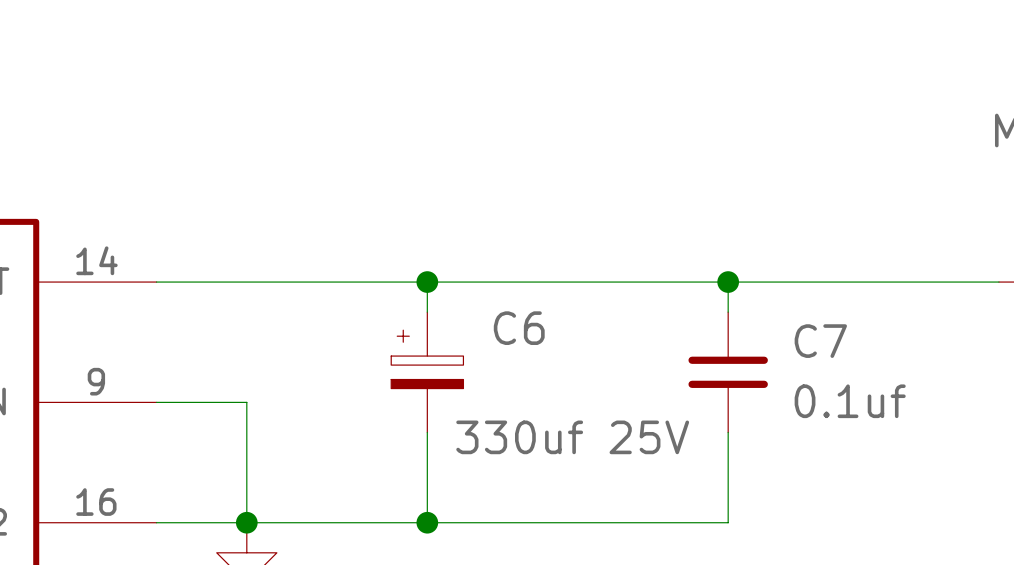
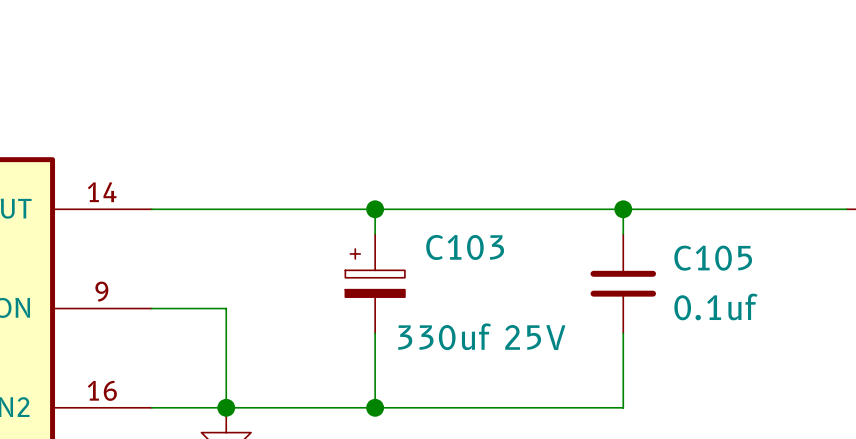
C6 name: C6 (519, 328) -> C103 (465, 247)
C7 name: C7 (820, 341) -> C105 (713, 258)

